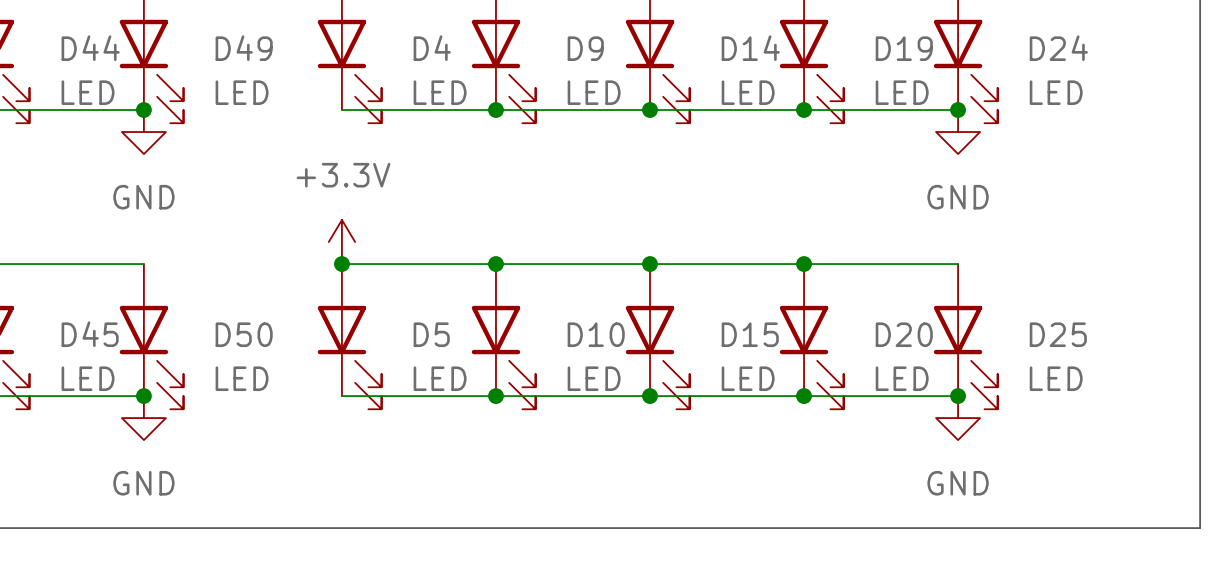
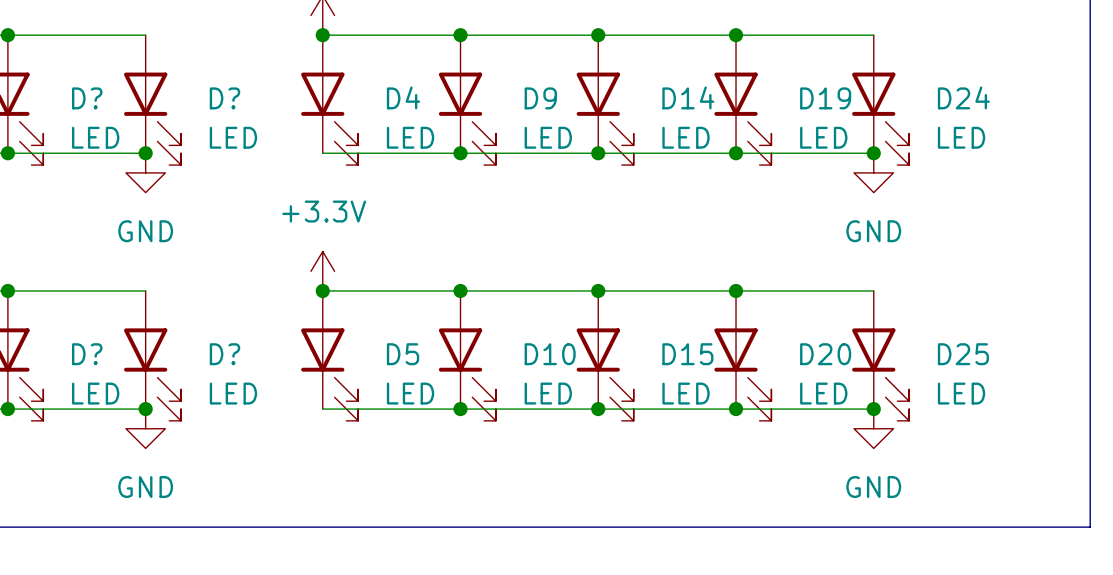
D44 name: D44 (90, 48) -> D? (87, 98)
D49 name: D49 (244, 48) -> D? (224, 98)
D45 name: D45 (90, 334) -> D? (87, 354)
D50 name: D50 (244, 334) -> D? (224, 354)

